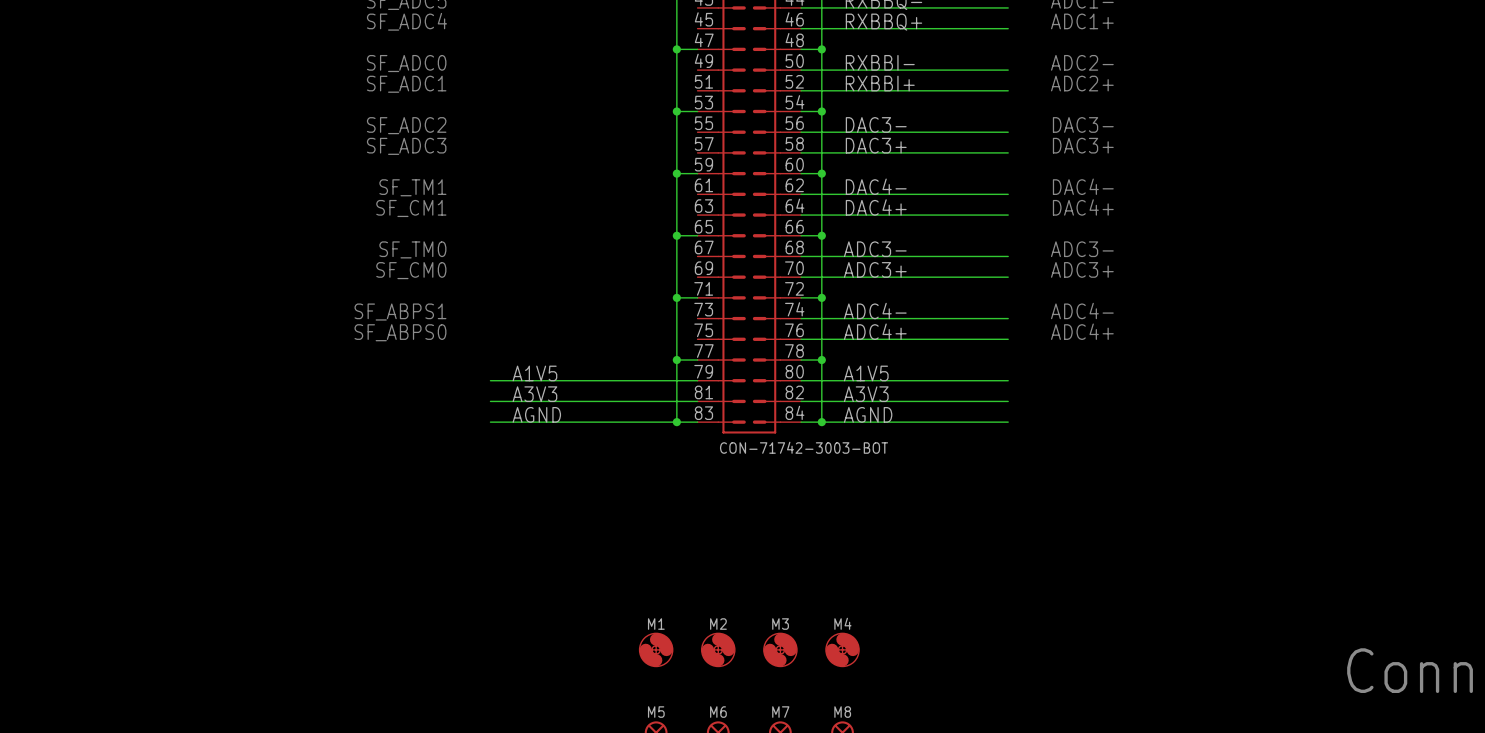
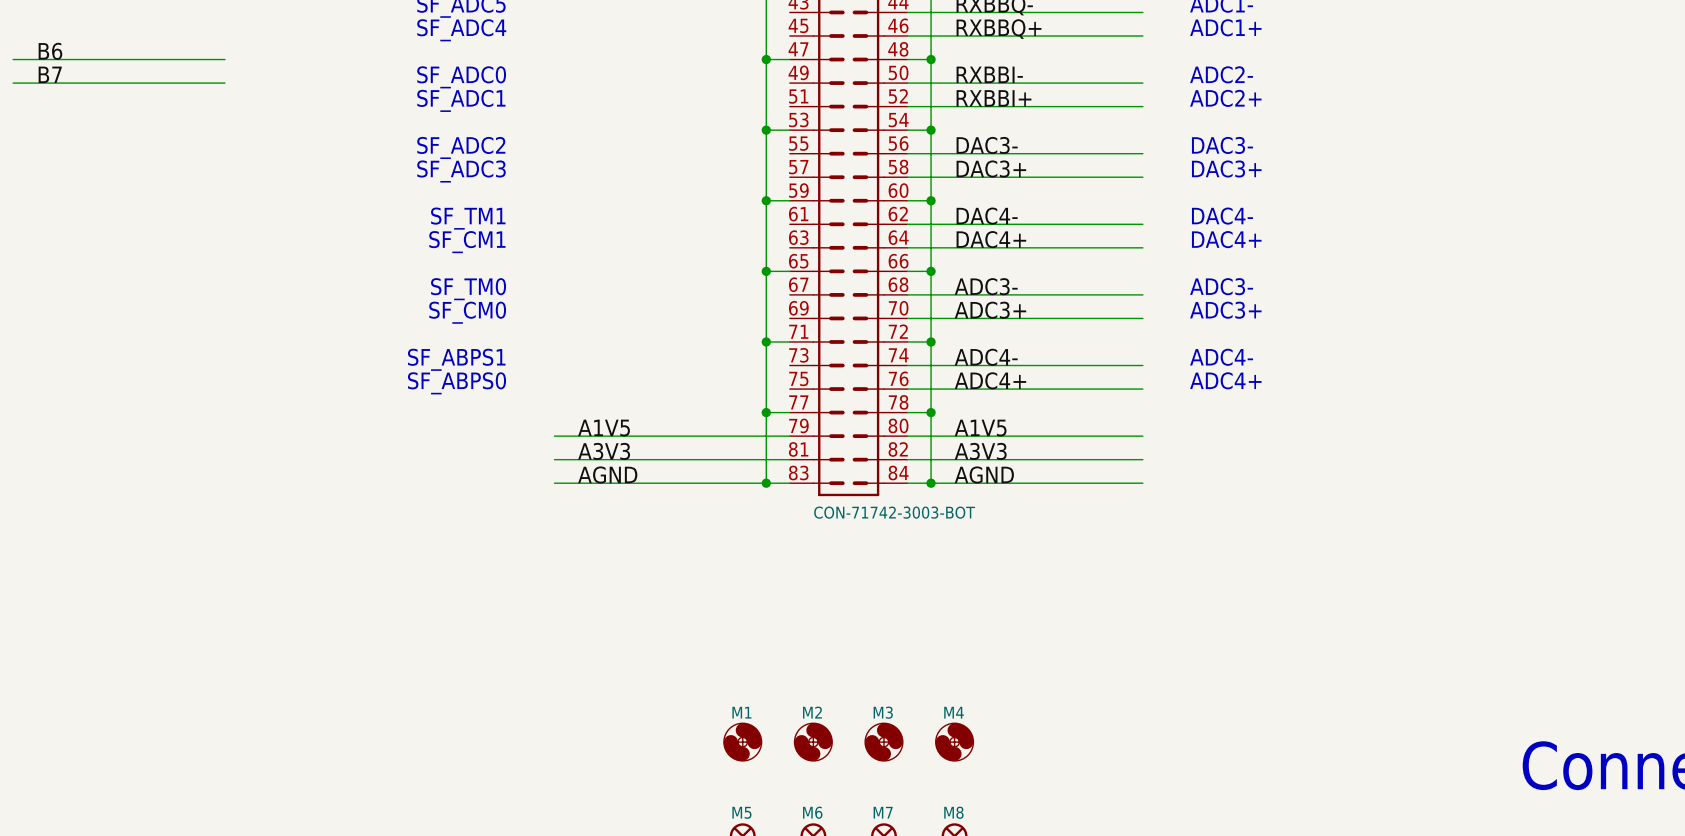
label: none -> B6 (50, 51)
wire: none -> (13, 59) (224, 59)
label: none -> B7 (50, 74)
wire: none -> (13, 83) (224, 83)

